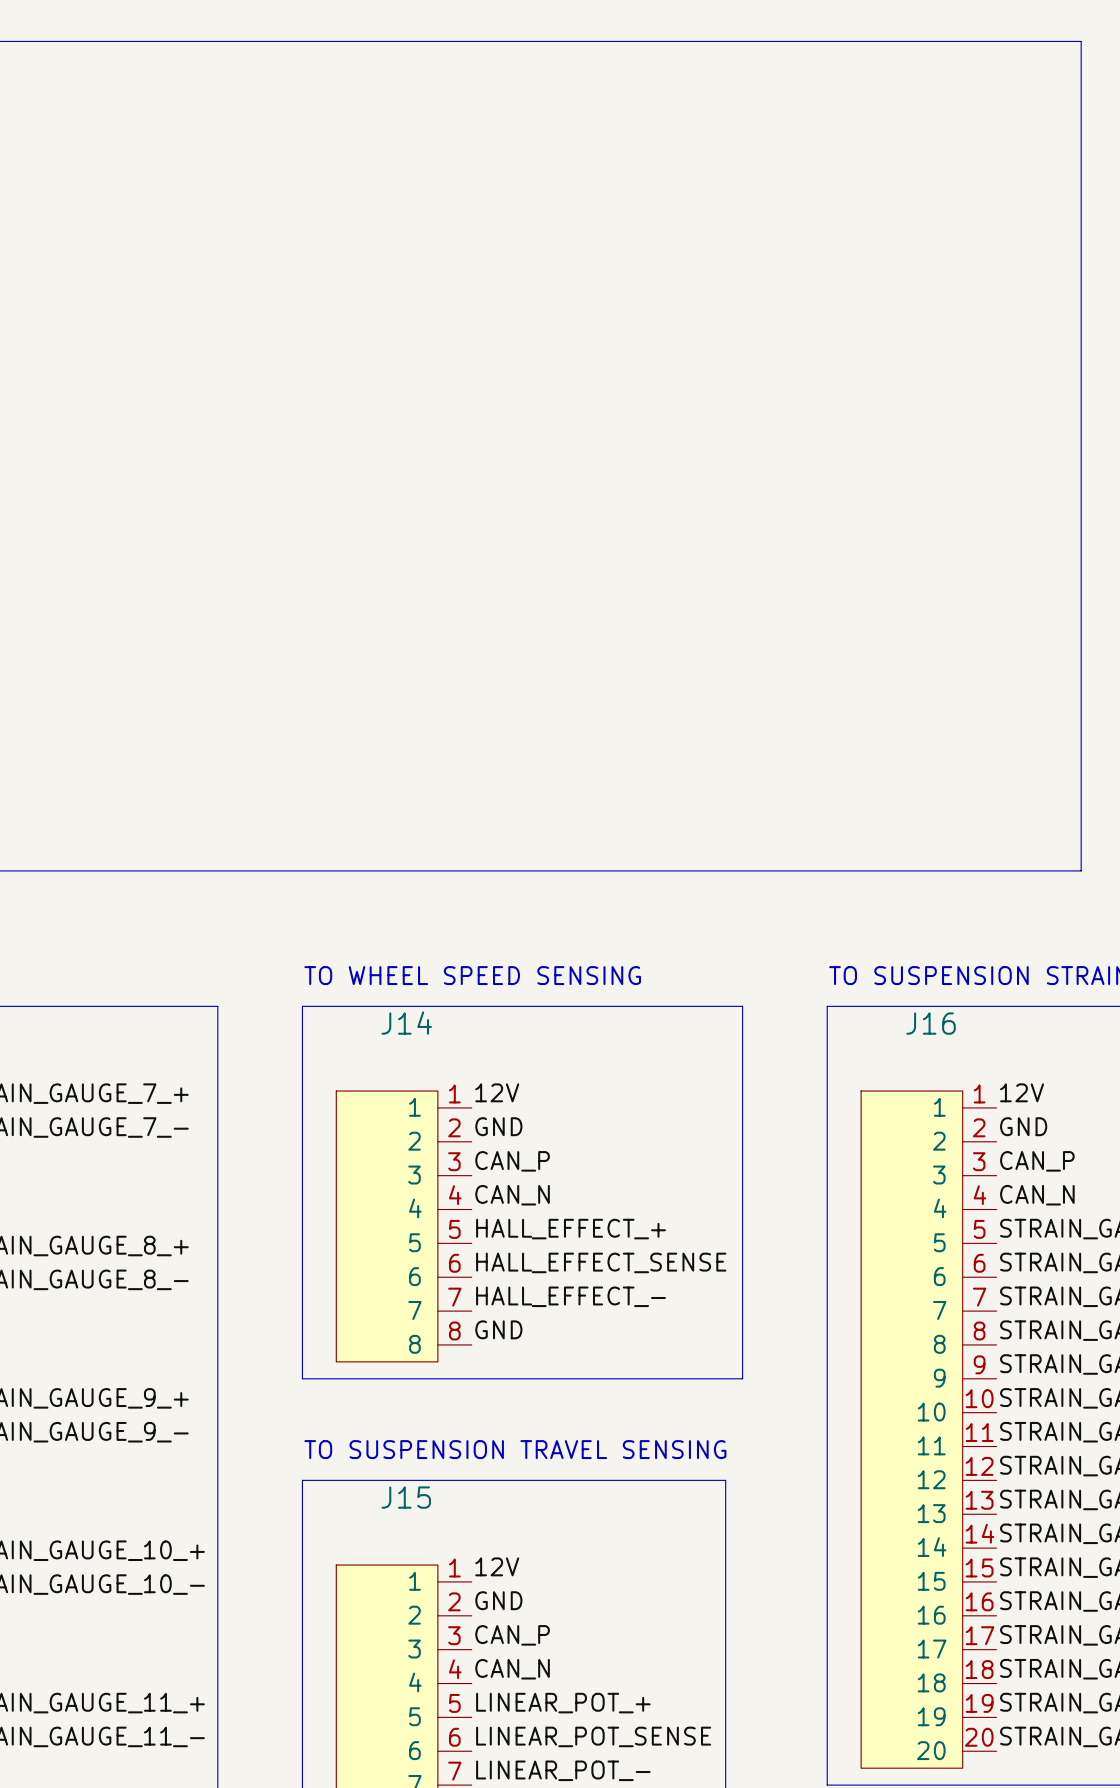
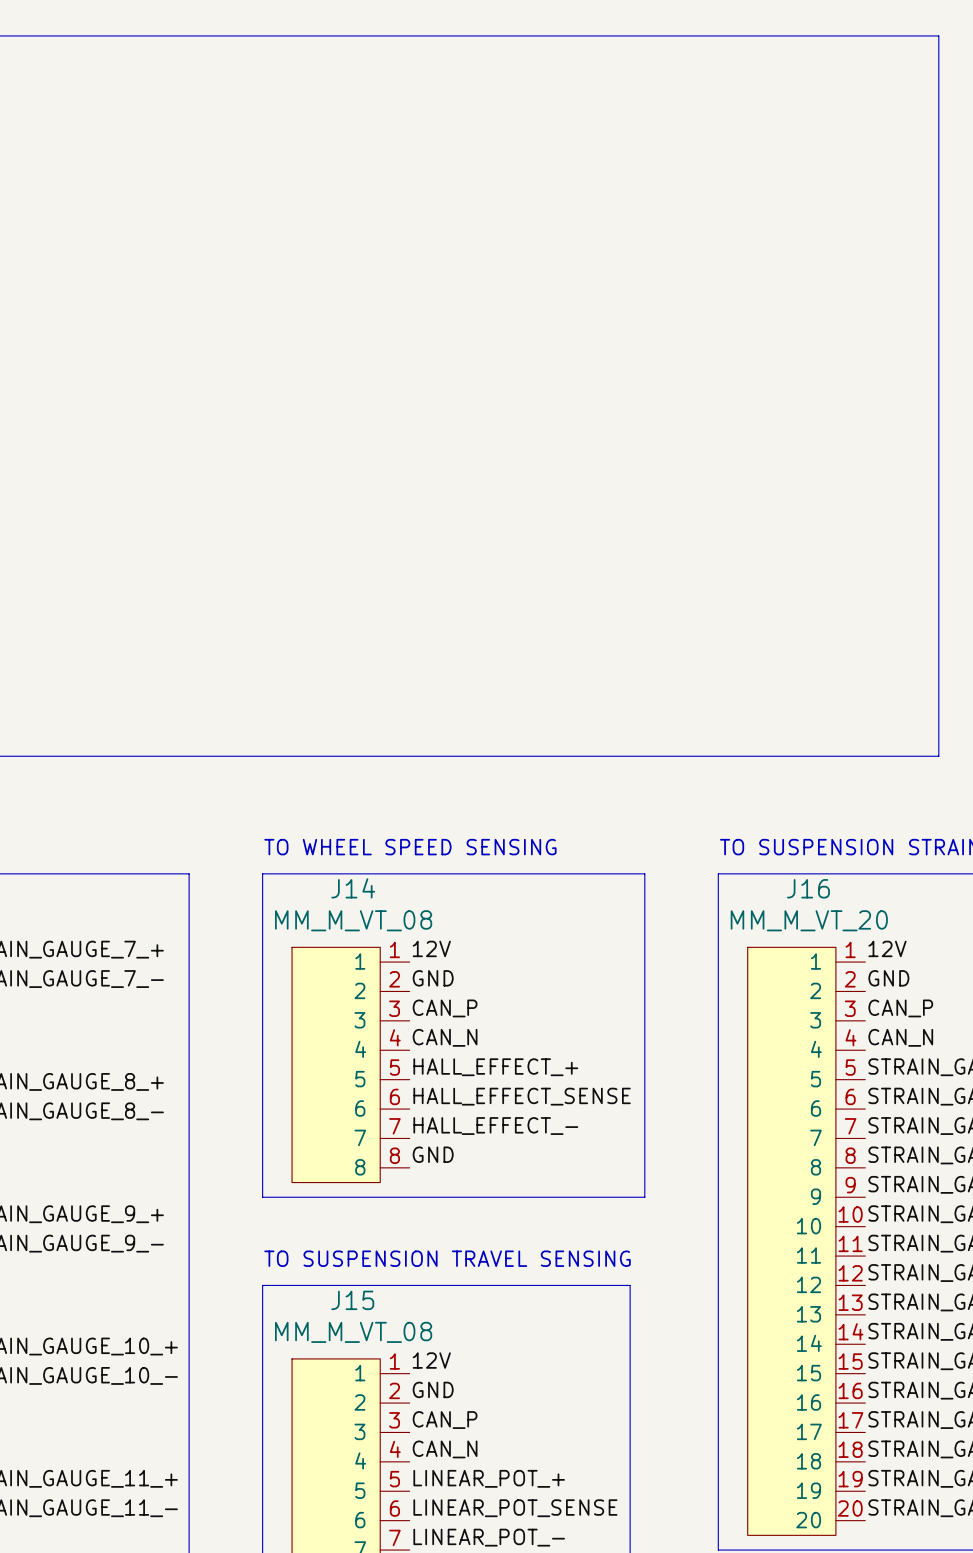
J14 value: none -> MM_M_VT_08 (353, 920)
J16 value: none -> MM_M_VT_20 (809, 920)
J15 value: none -> MM_M_VT_08 (353, 1332)

